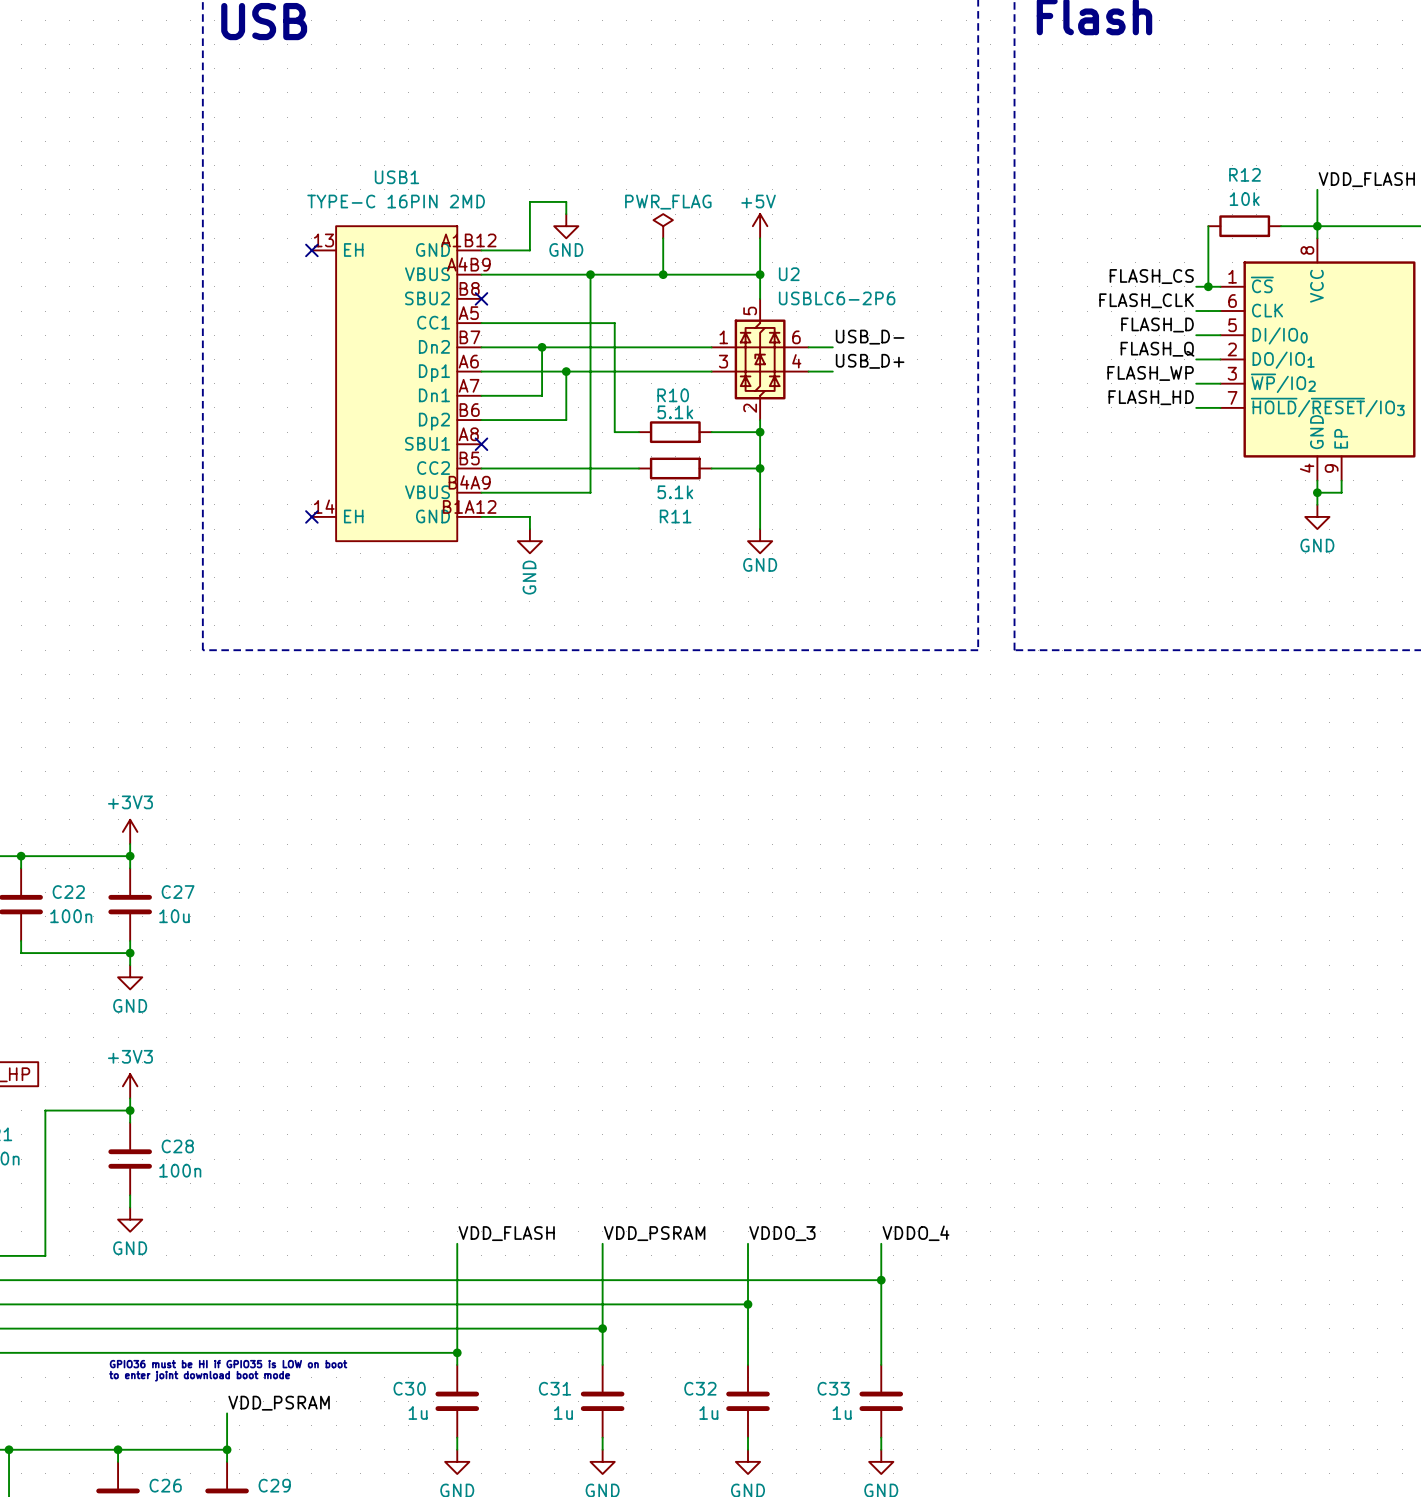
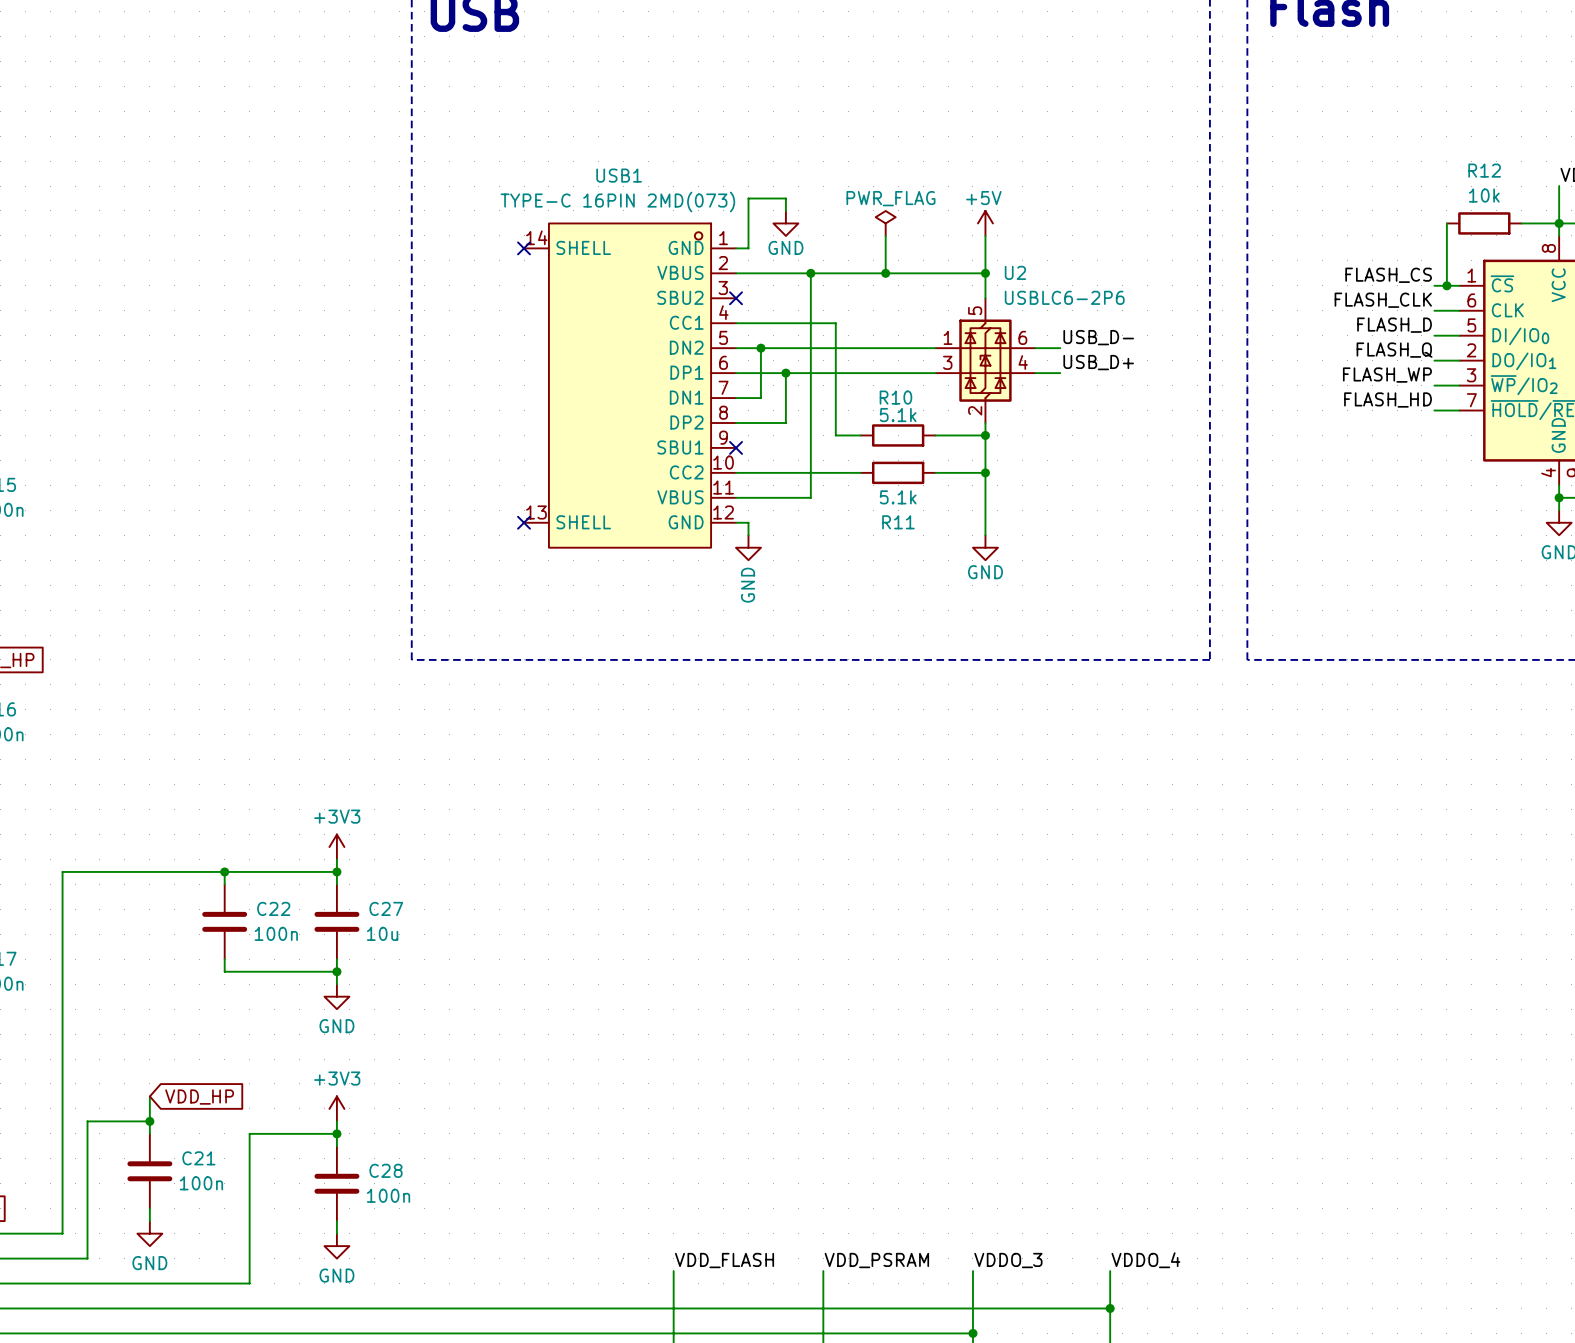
USB1 value: TYPE-C 16PIN 2MD (396, 201) -> TYPE-C 16PIN 2MD(073) (617, 202)
USB1 symbol: [311, 226, 482, 542] -> [524, 223, 737, 548]
no-connect mark position: (481, 298) -> (736, 298)
no-connect mark position: (481, 444) -> (736, 447)

